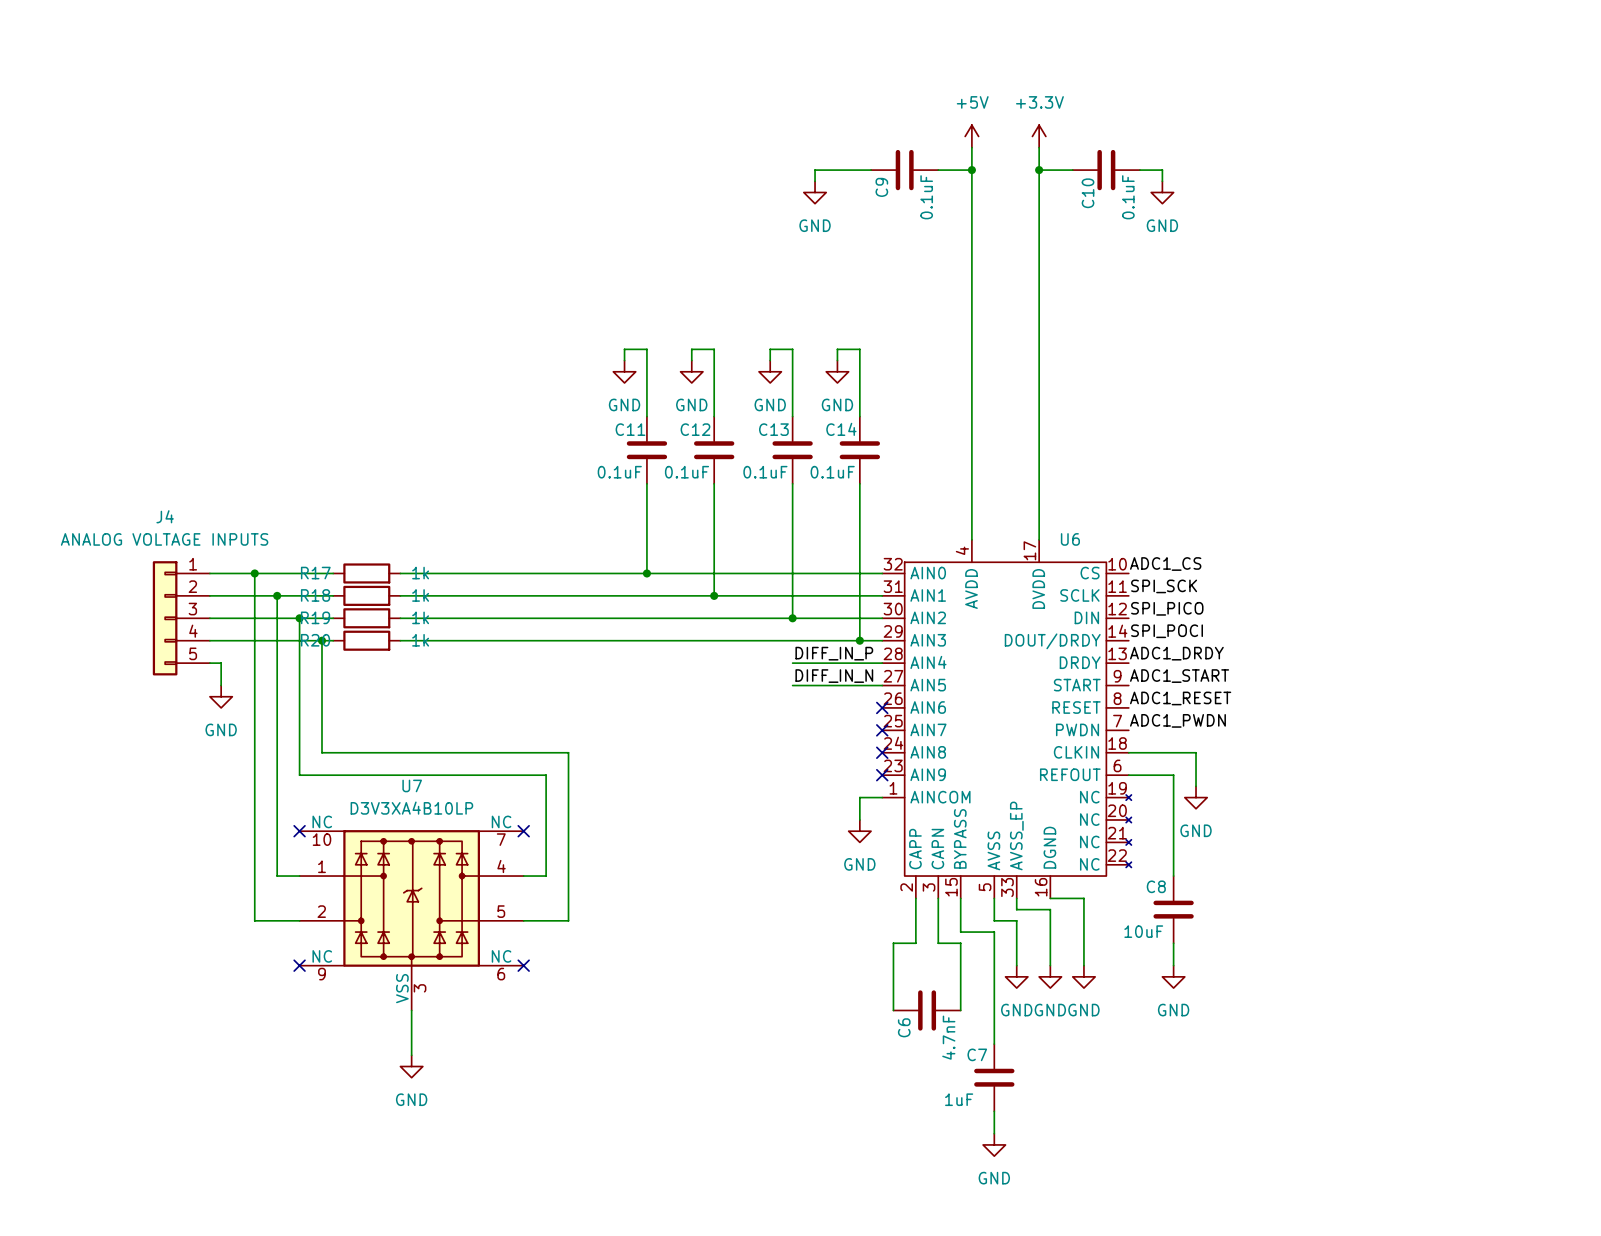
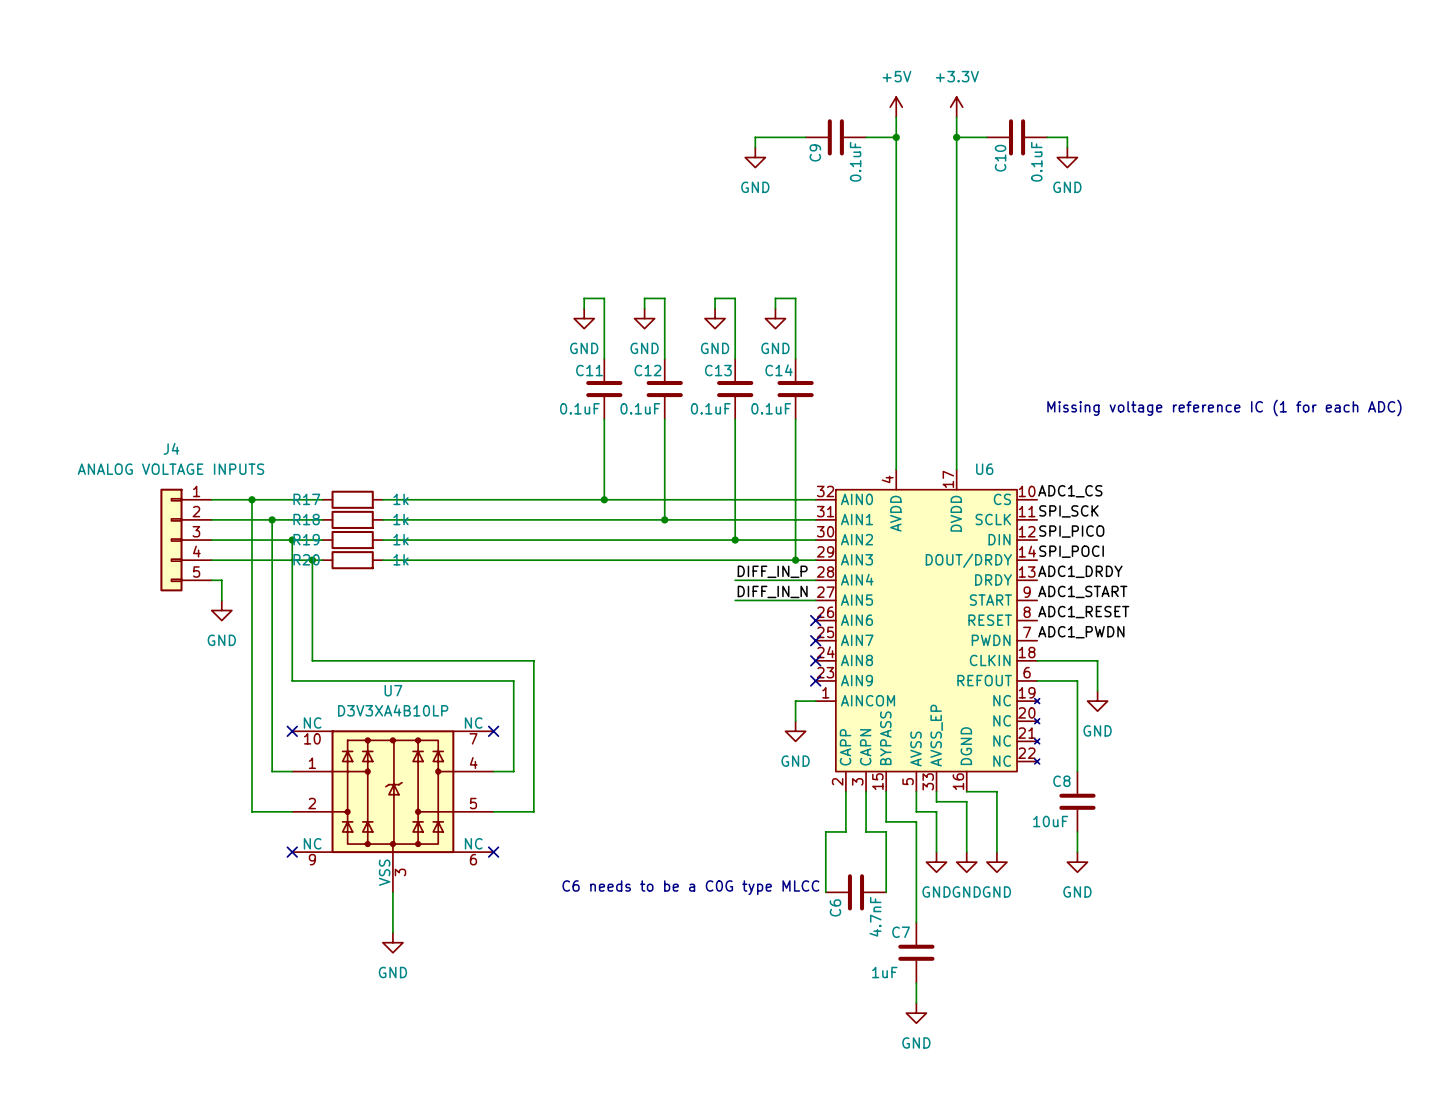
text: none -> Missing voltage reference IC (1 for each ADC) (1224, 408)
U6 symbol: [882, 539, 1132, 899] -> [815, 469, 1040, 792]
text: none -> C6 needs to be a C0G type MLCC (690, 887)

